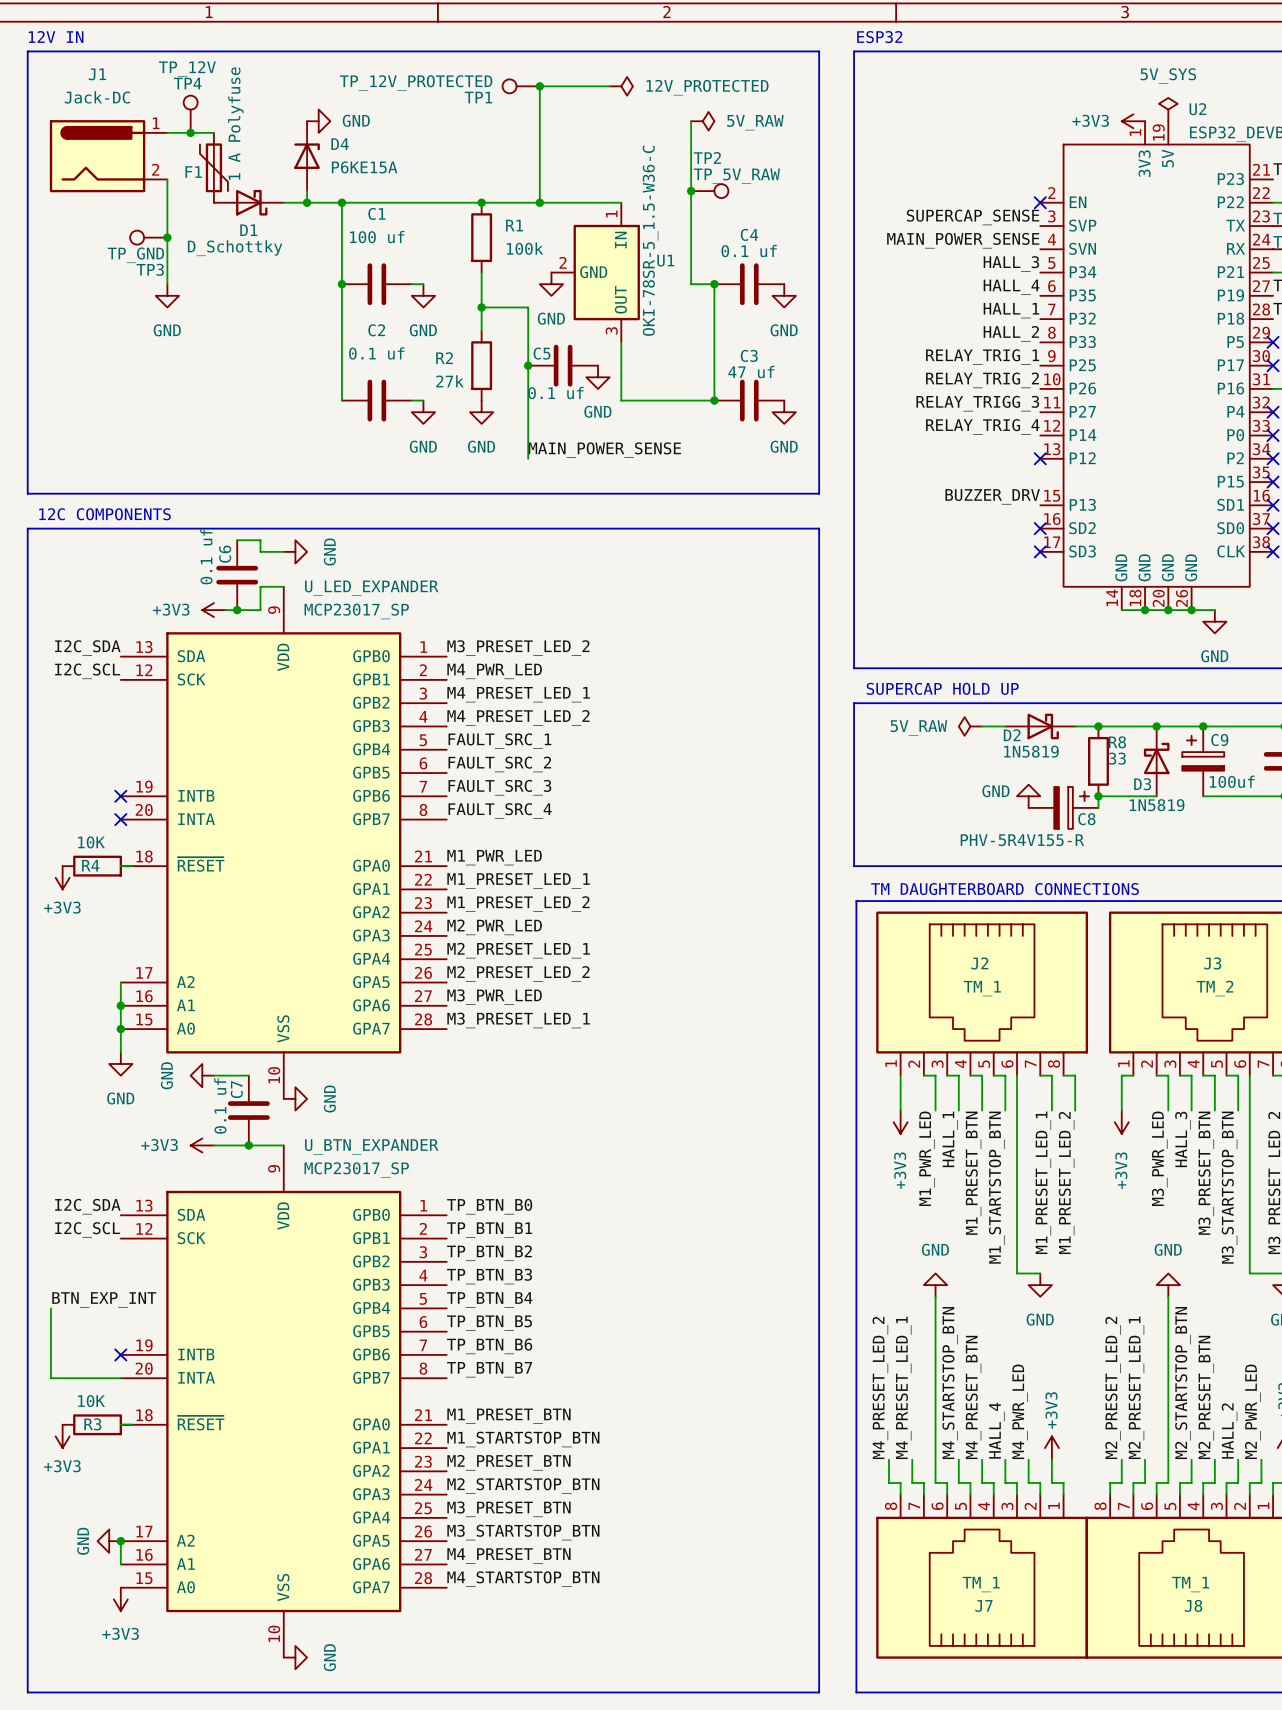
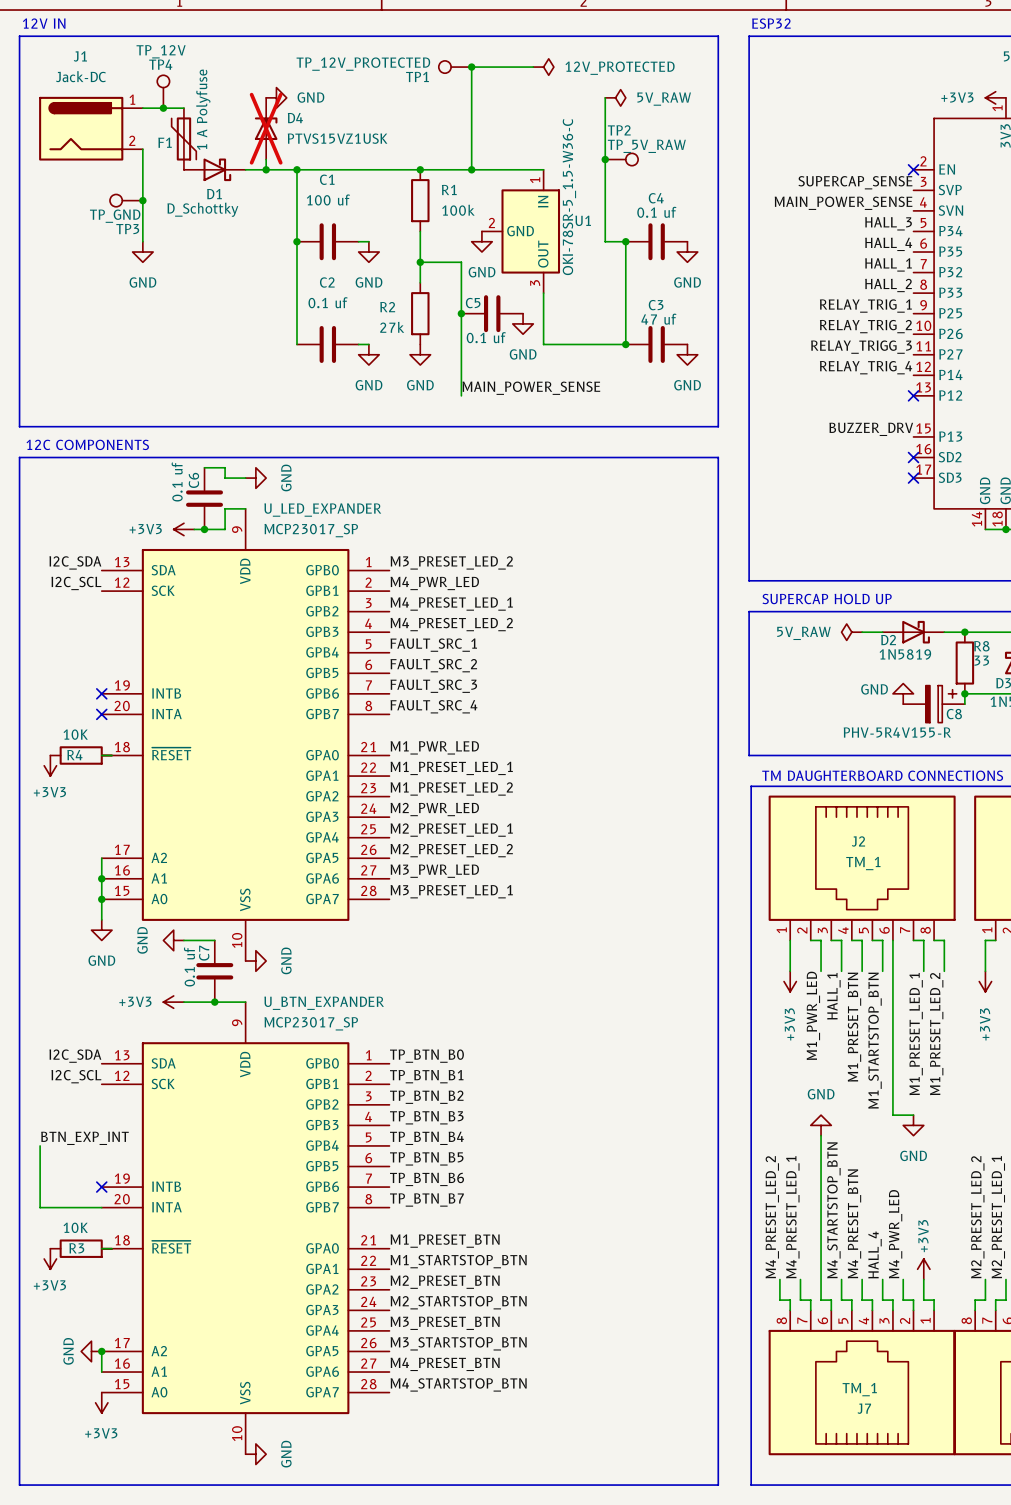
D4 do-not-place cross: none -> (266, 128)
D4 value: P6KE15A (364, 167) -> PTVS15VZ1USK (337, 138)

